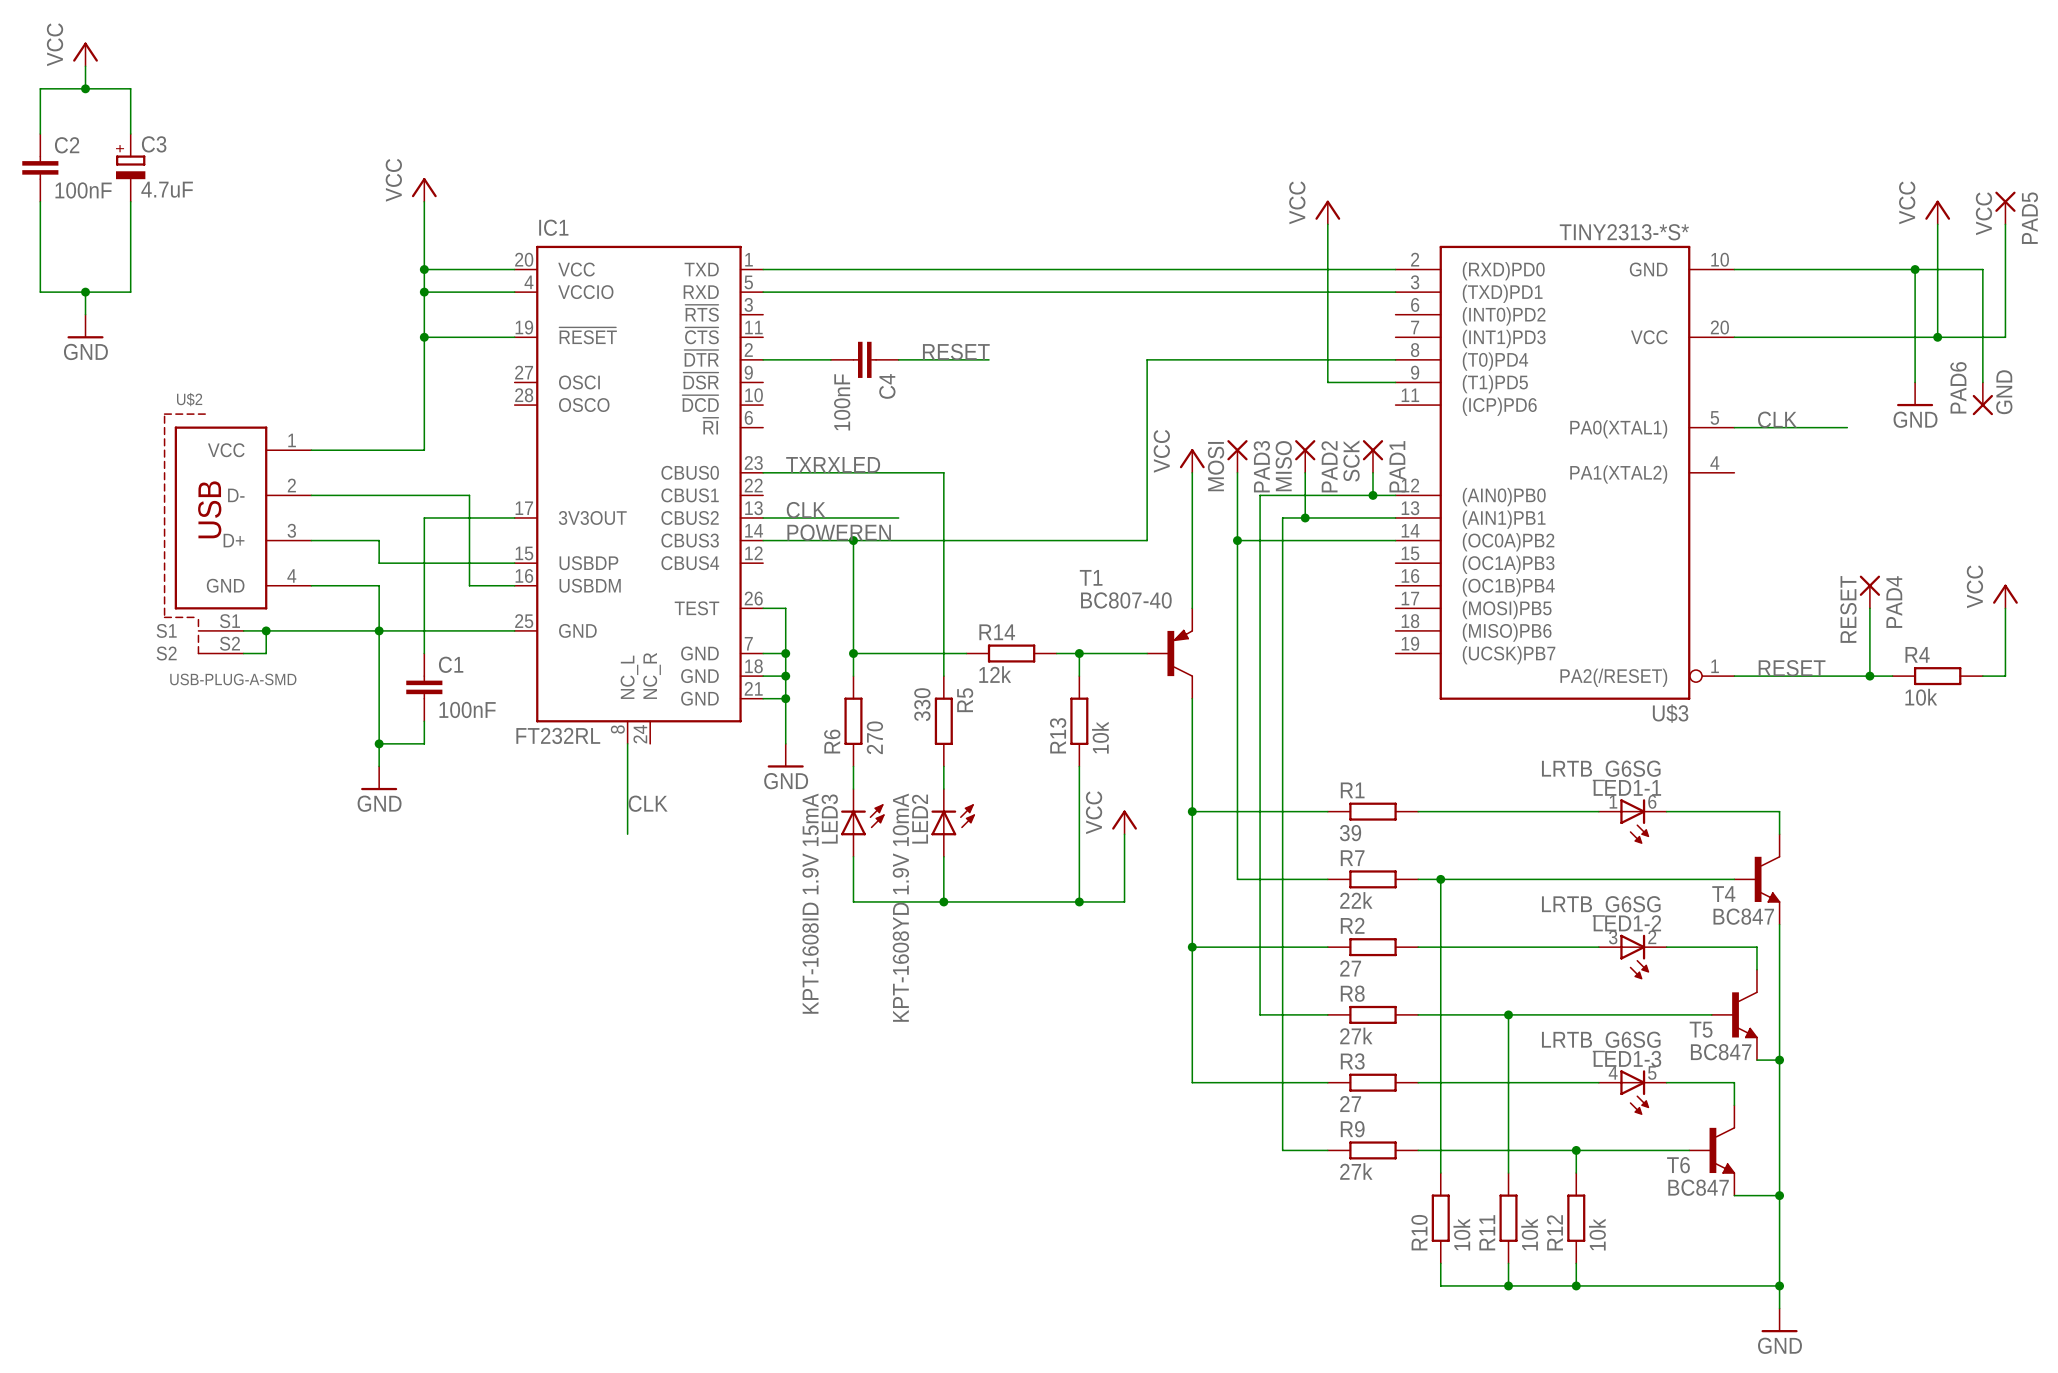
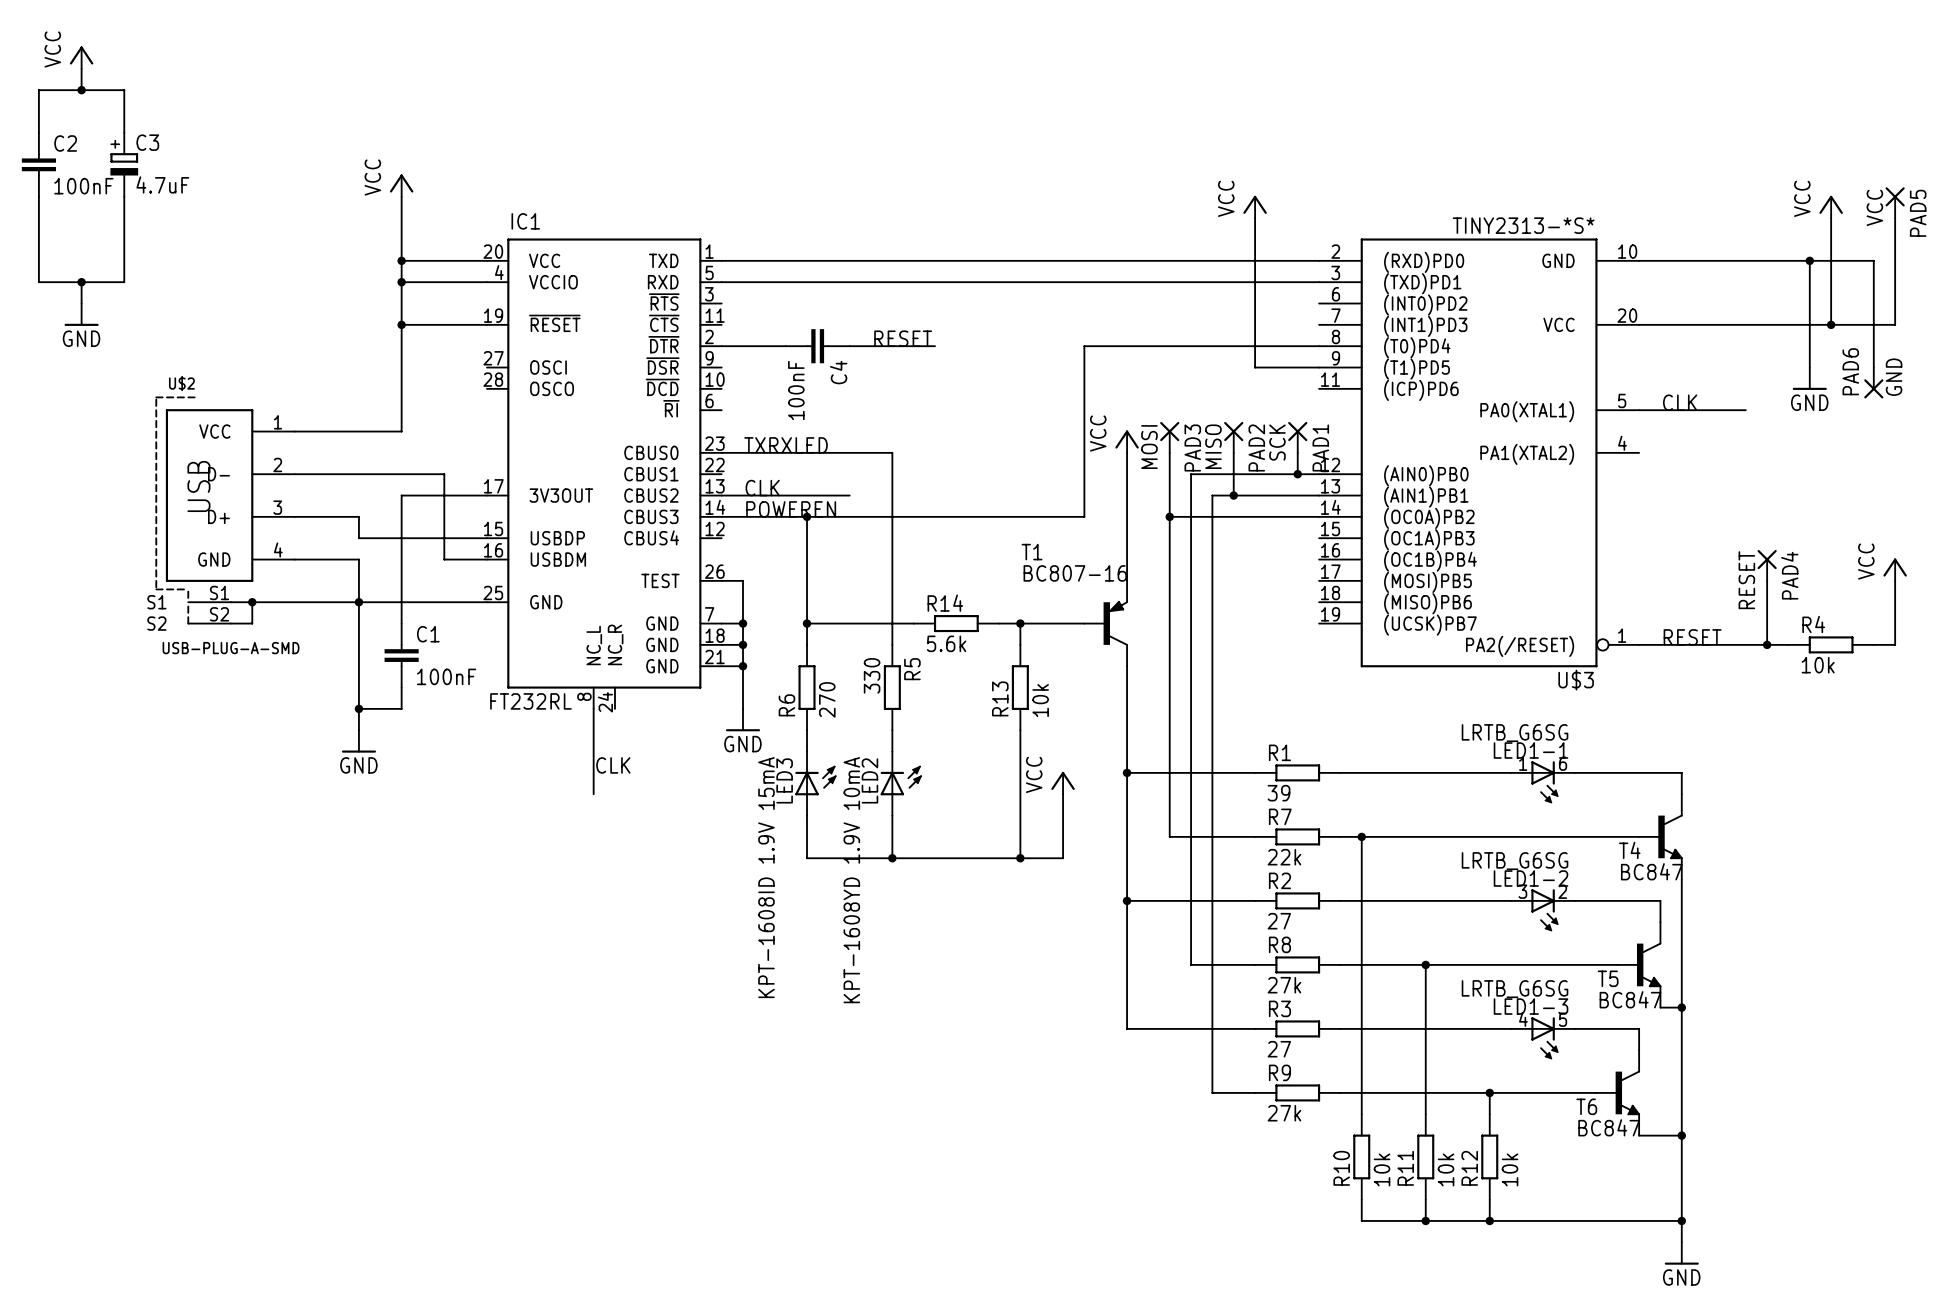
T1 value: BC807-40 (1126, 600) -> BC807-16 (1075, 573)
R14 value: 12k (995, 674) -> 5.6k (946, 643)

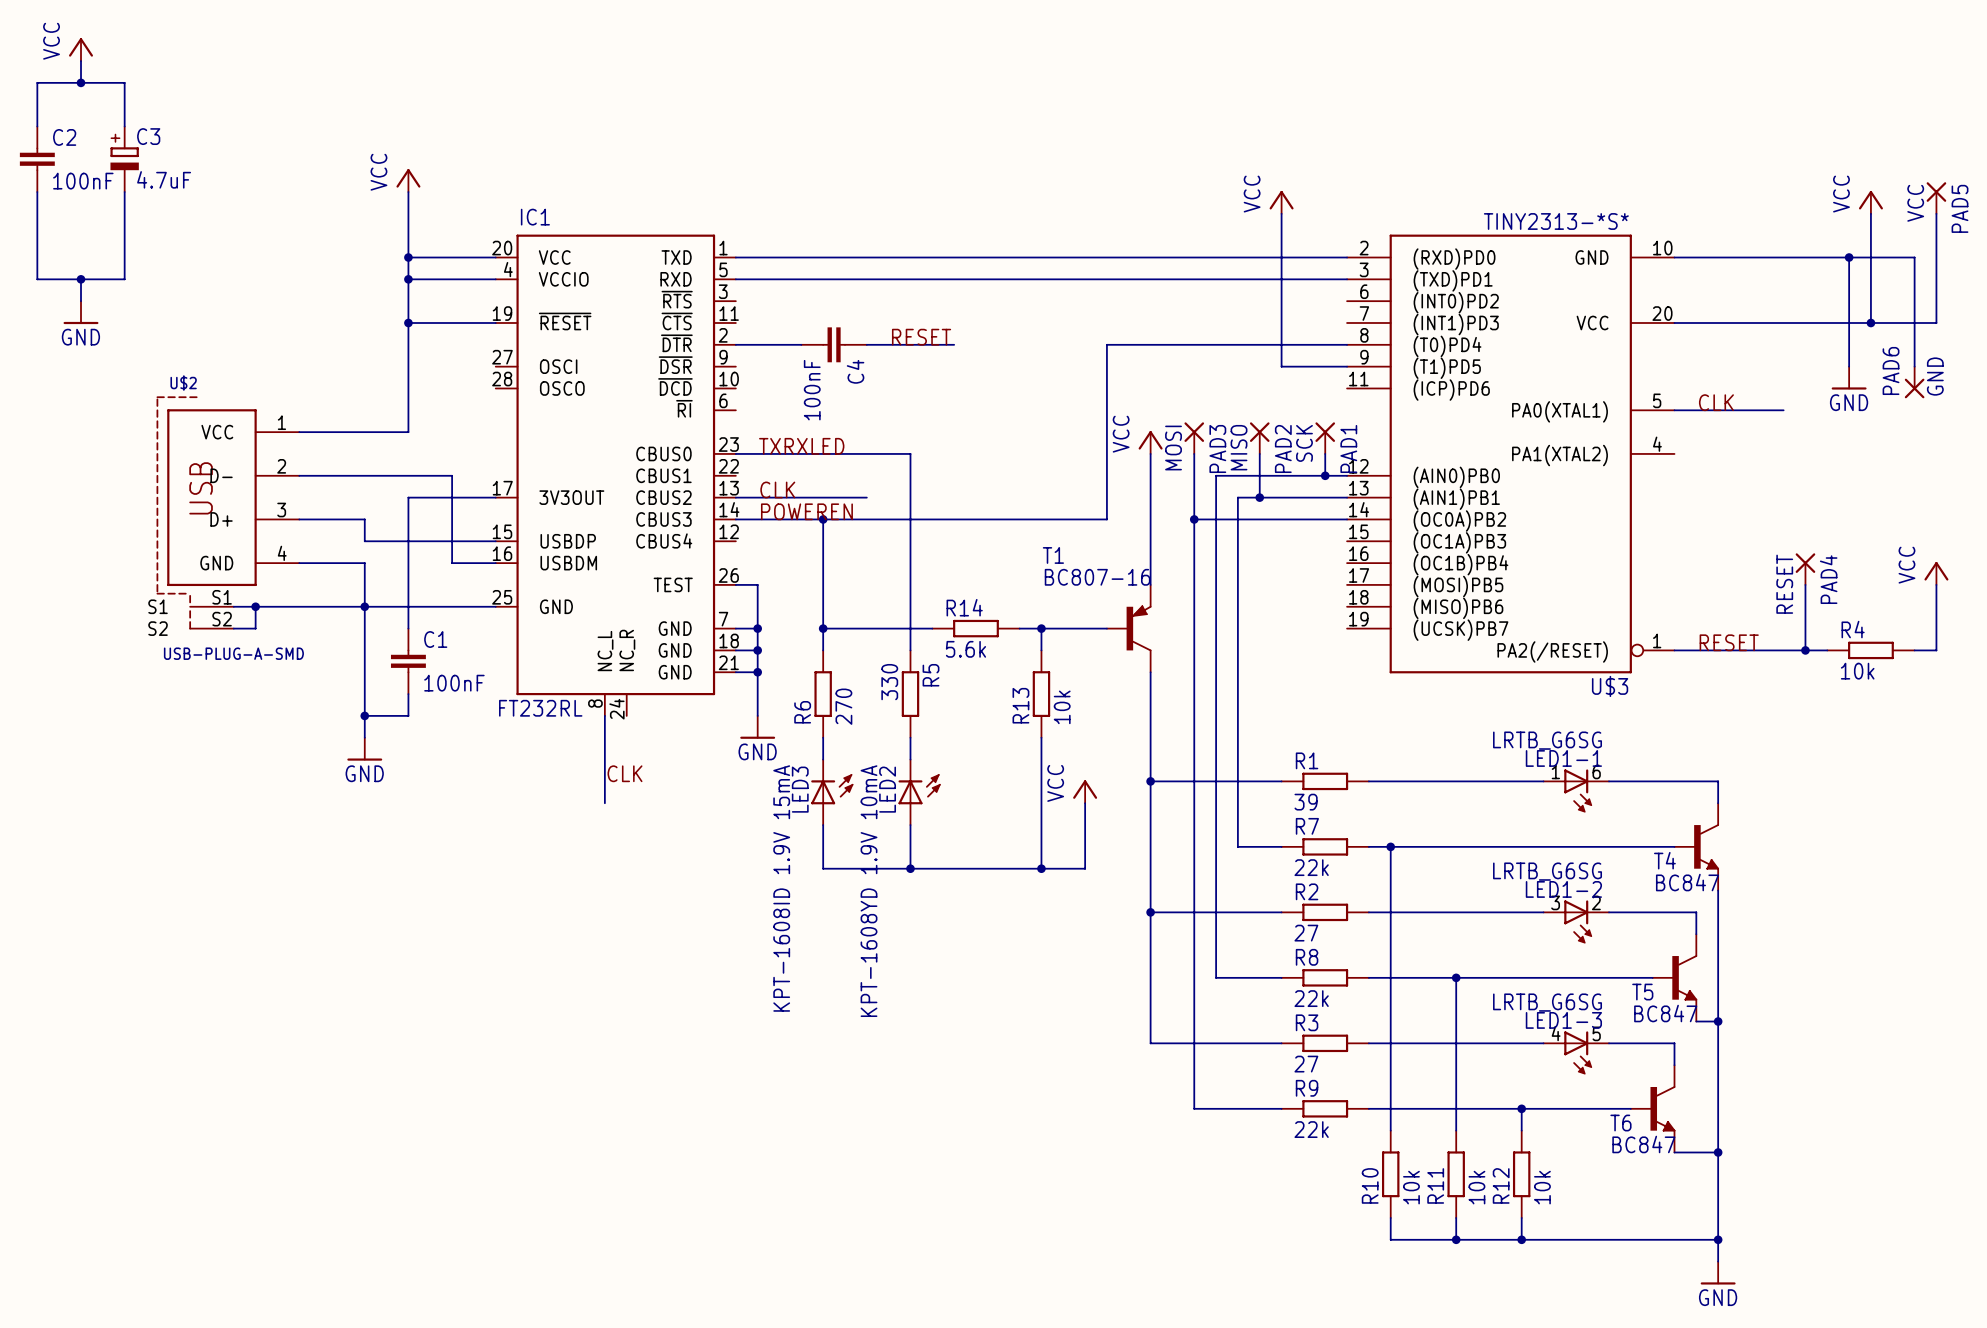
wire: (1169, 836) (1212, 836) (1212, 1092) -> (1194, 846) (1194, 1108) (1237, 1108)
R8 value: 27k (1284, 985) -> 22k (1311, 998)
R9 value: 27k (1284, 1113) -> 22k (1311, 1129)

